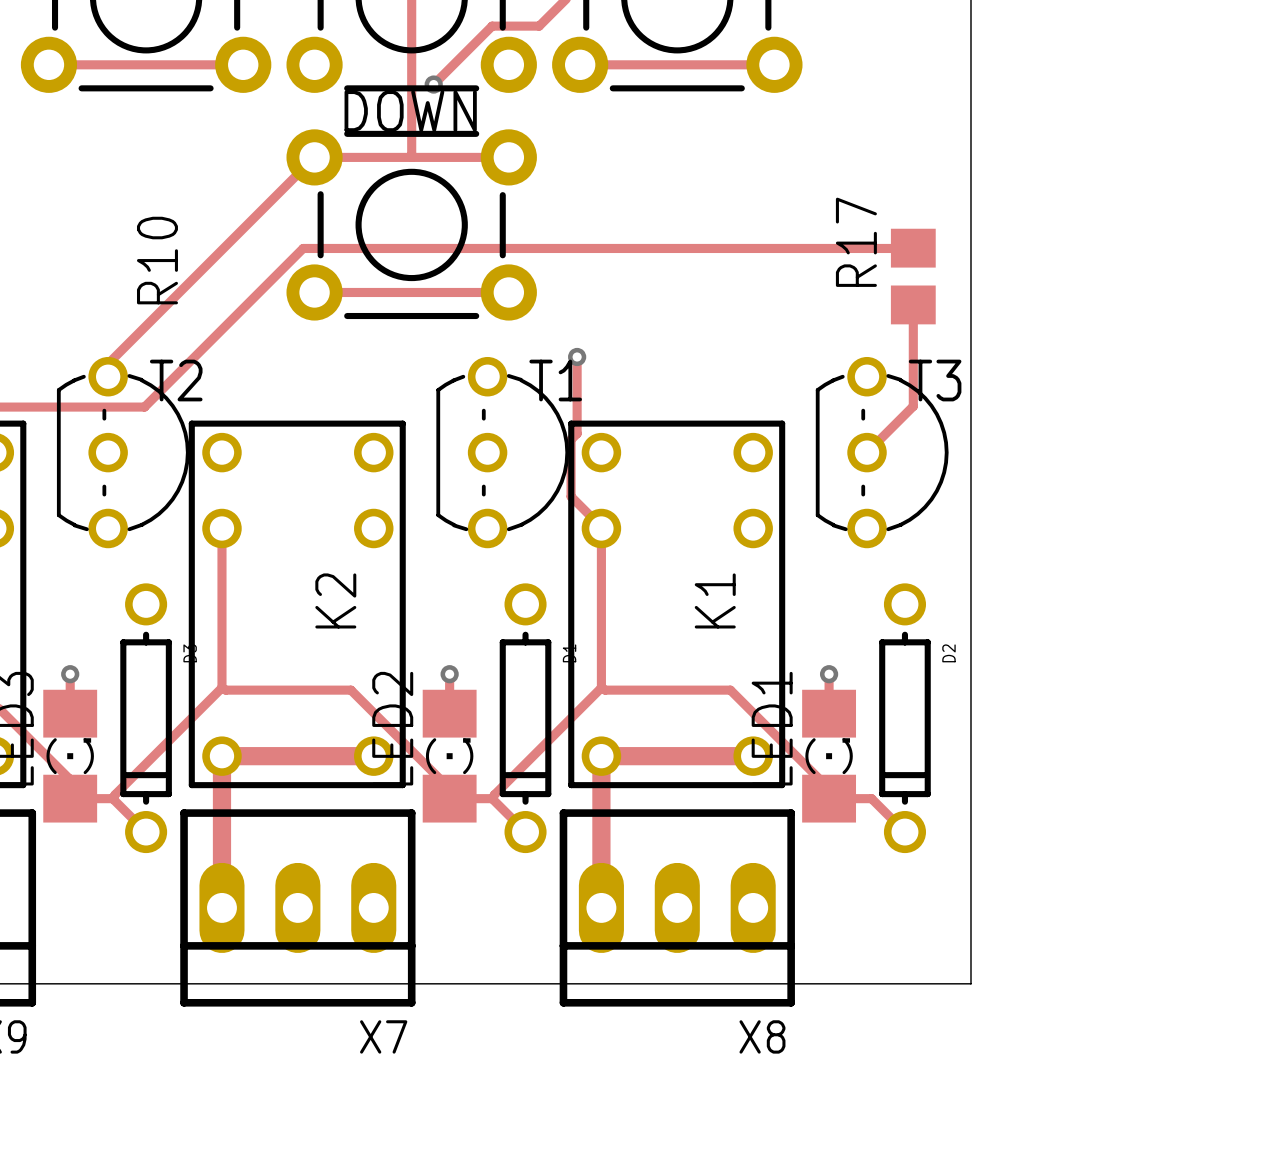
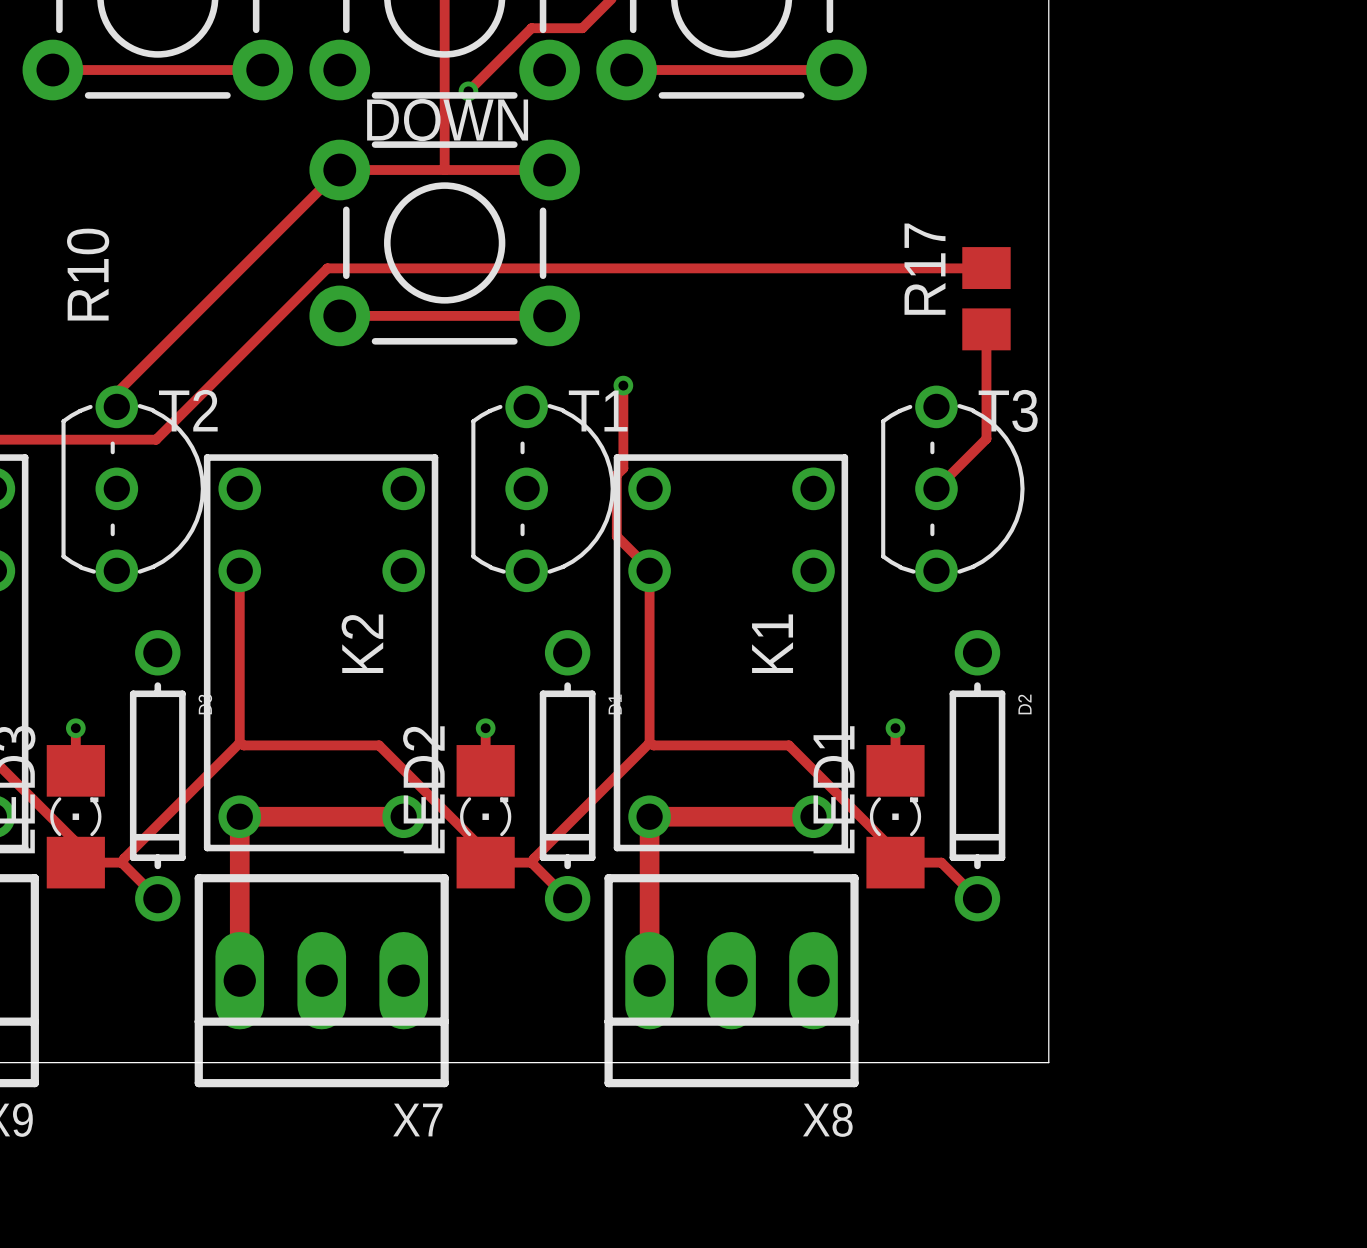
R10 position: (157, 260) -> (88, 274)

